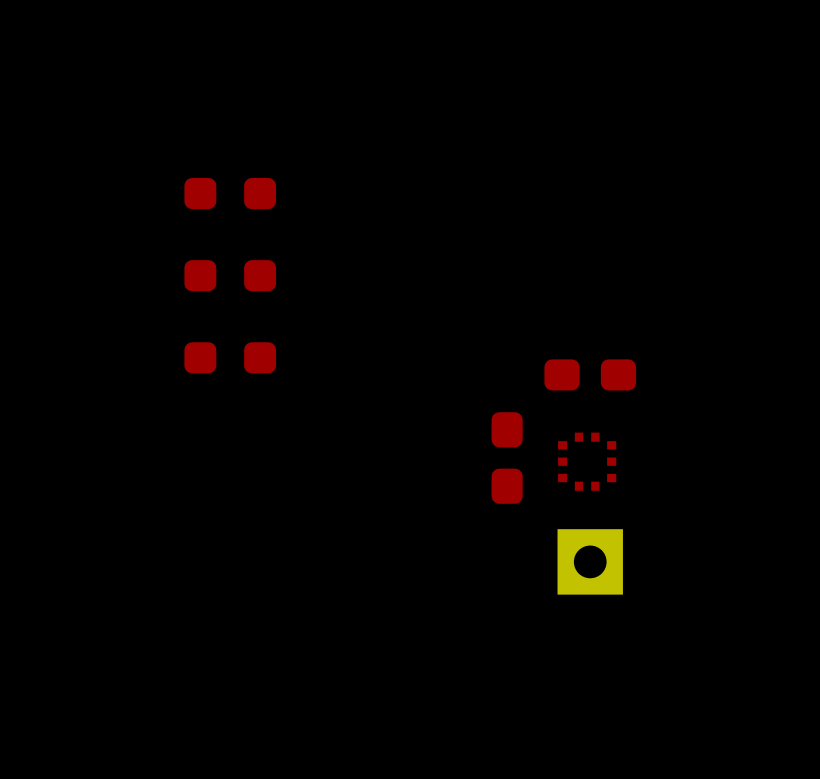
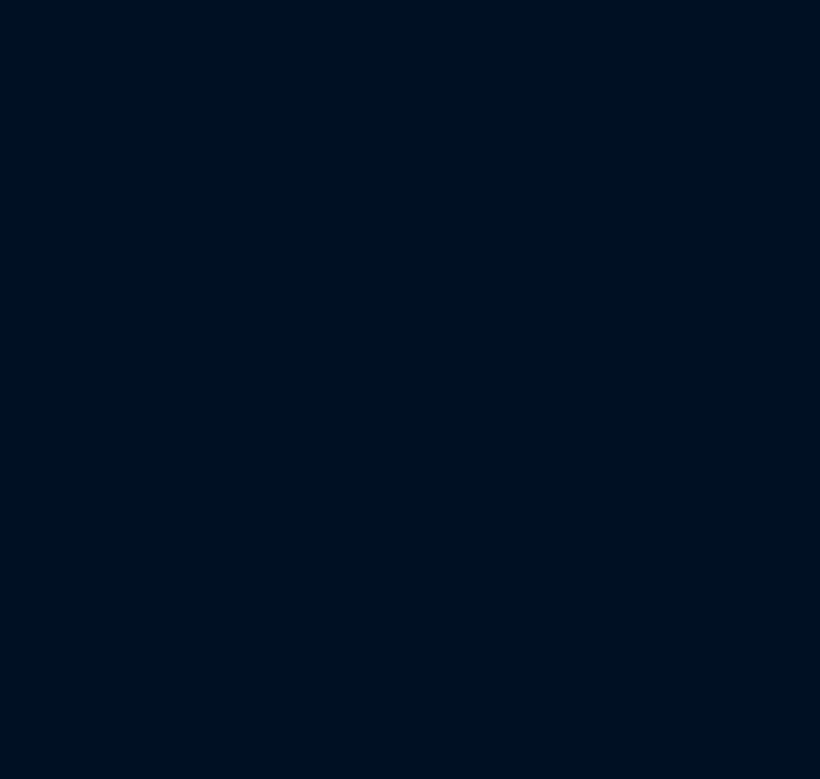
part: (230, 193) -> none
part: (230, 275) -> none
part: (230, 357) -> none
part: (590, 374) -> none
part: (507, 458) -> none
part: (587, 461) -> none
part: (590, 561) -> none

